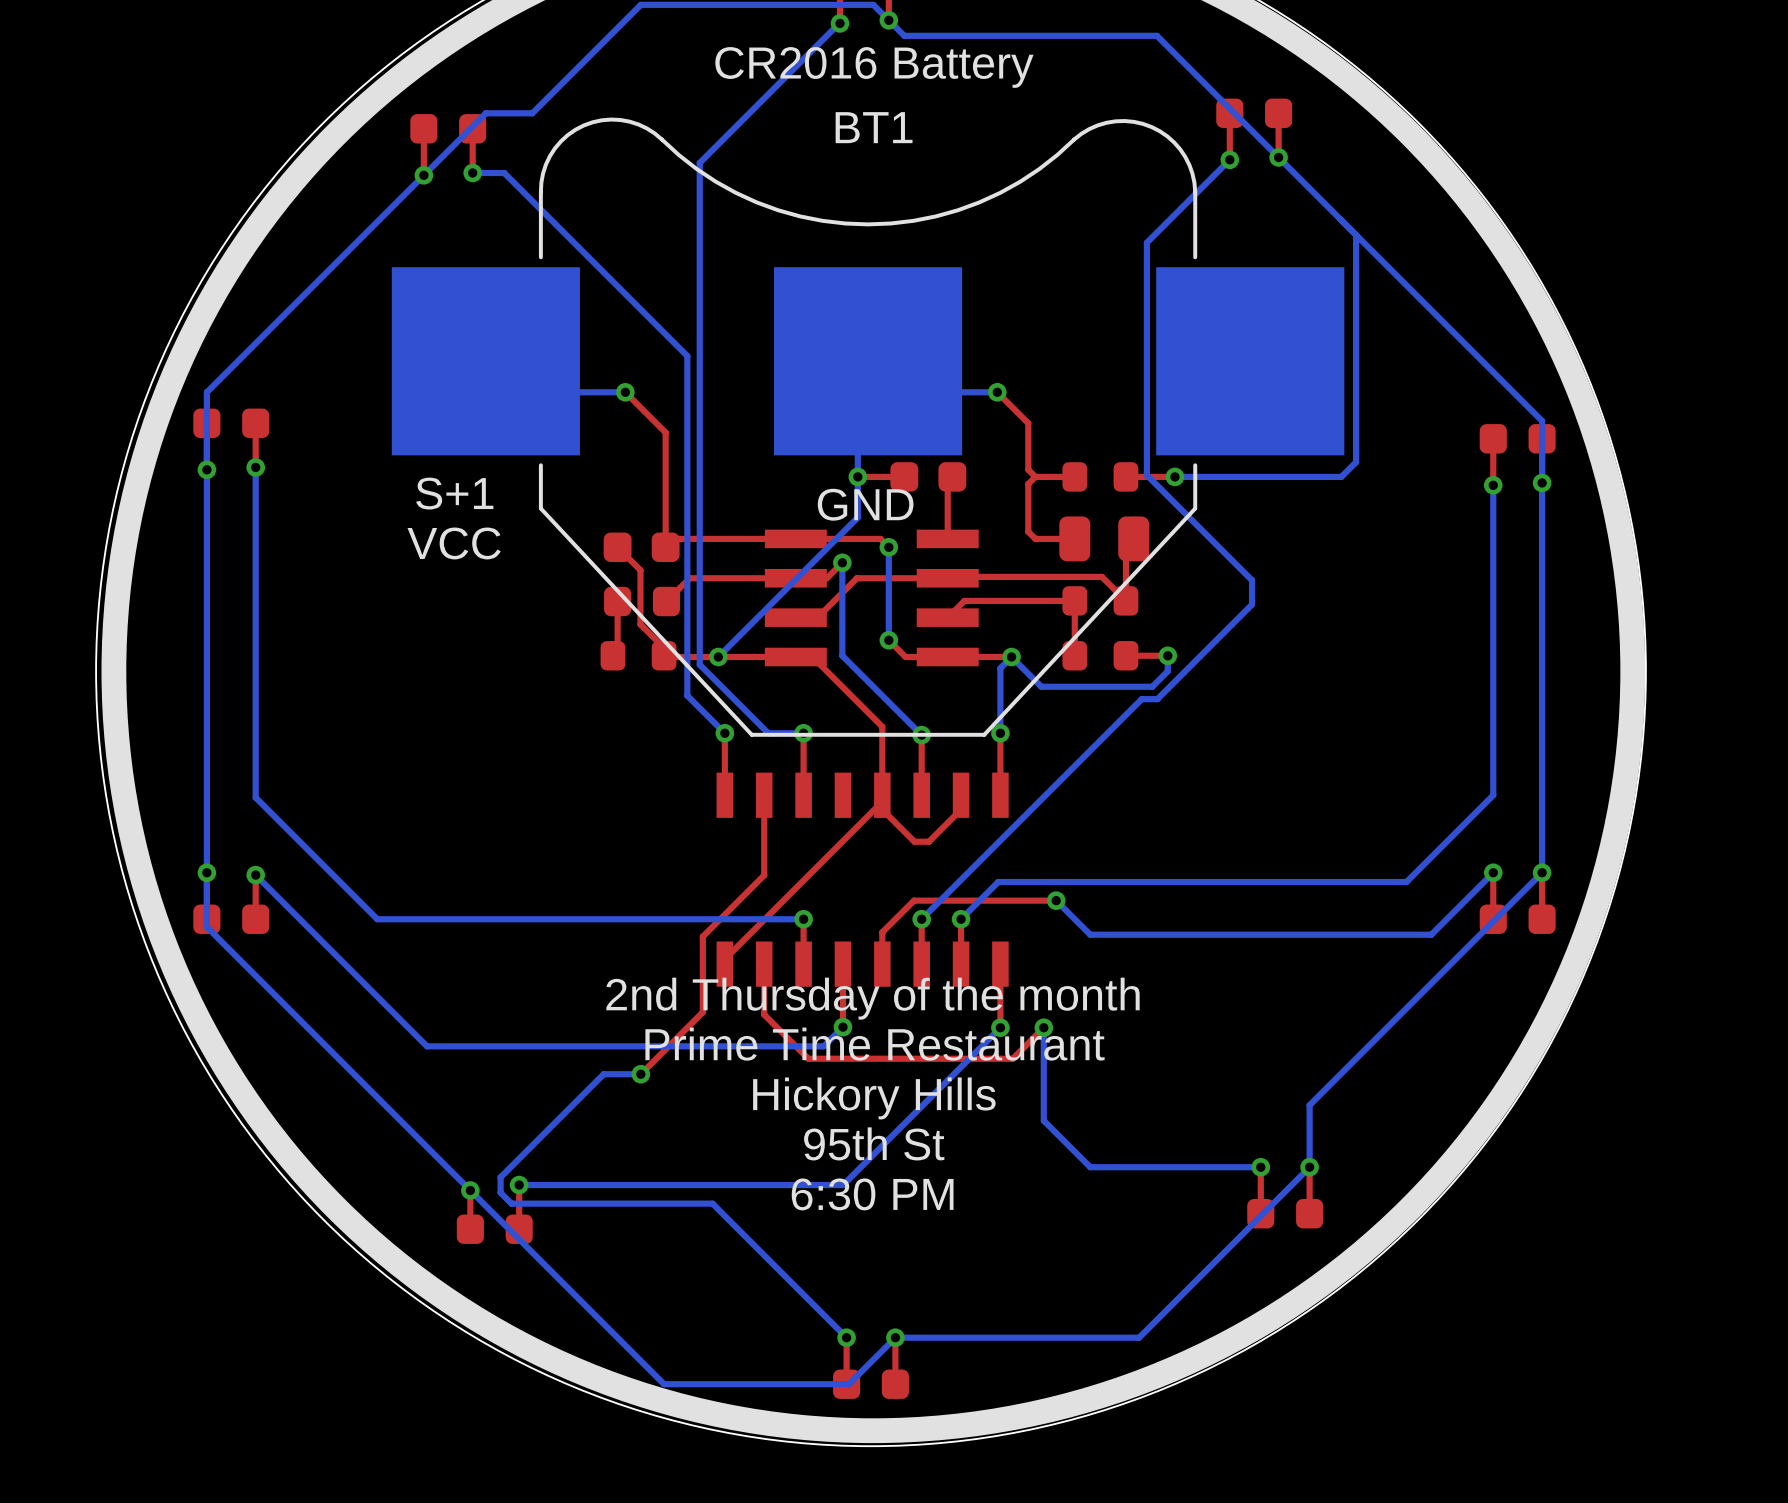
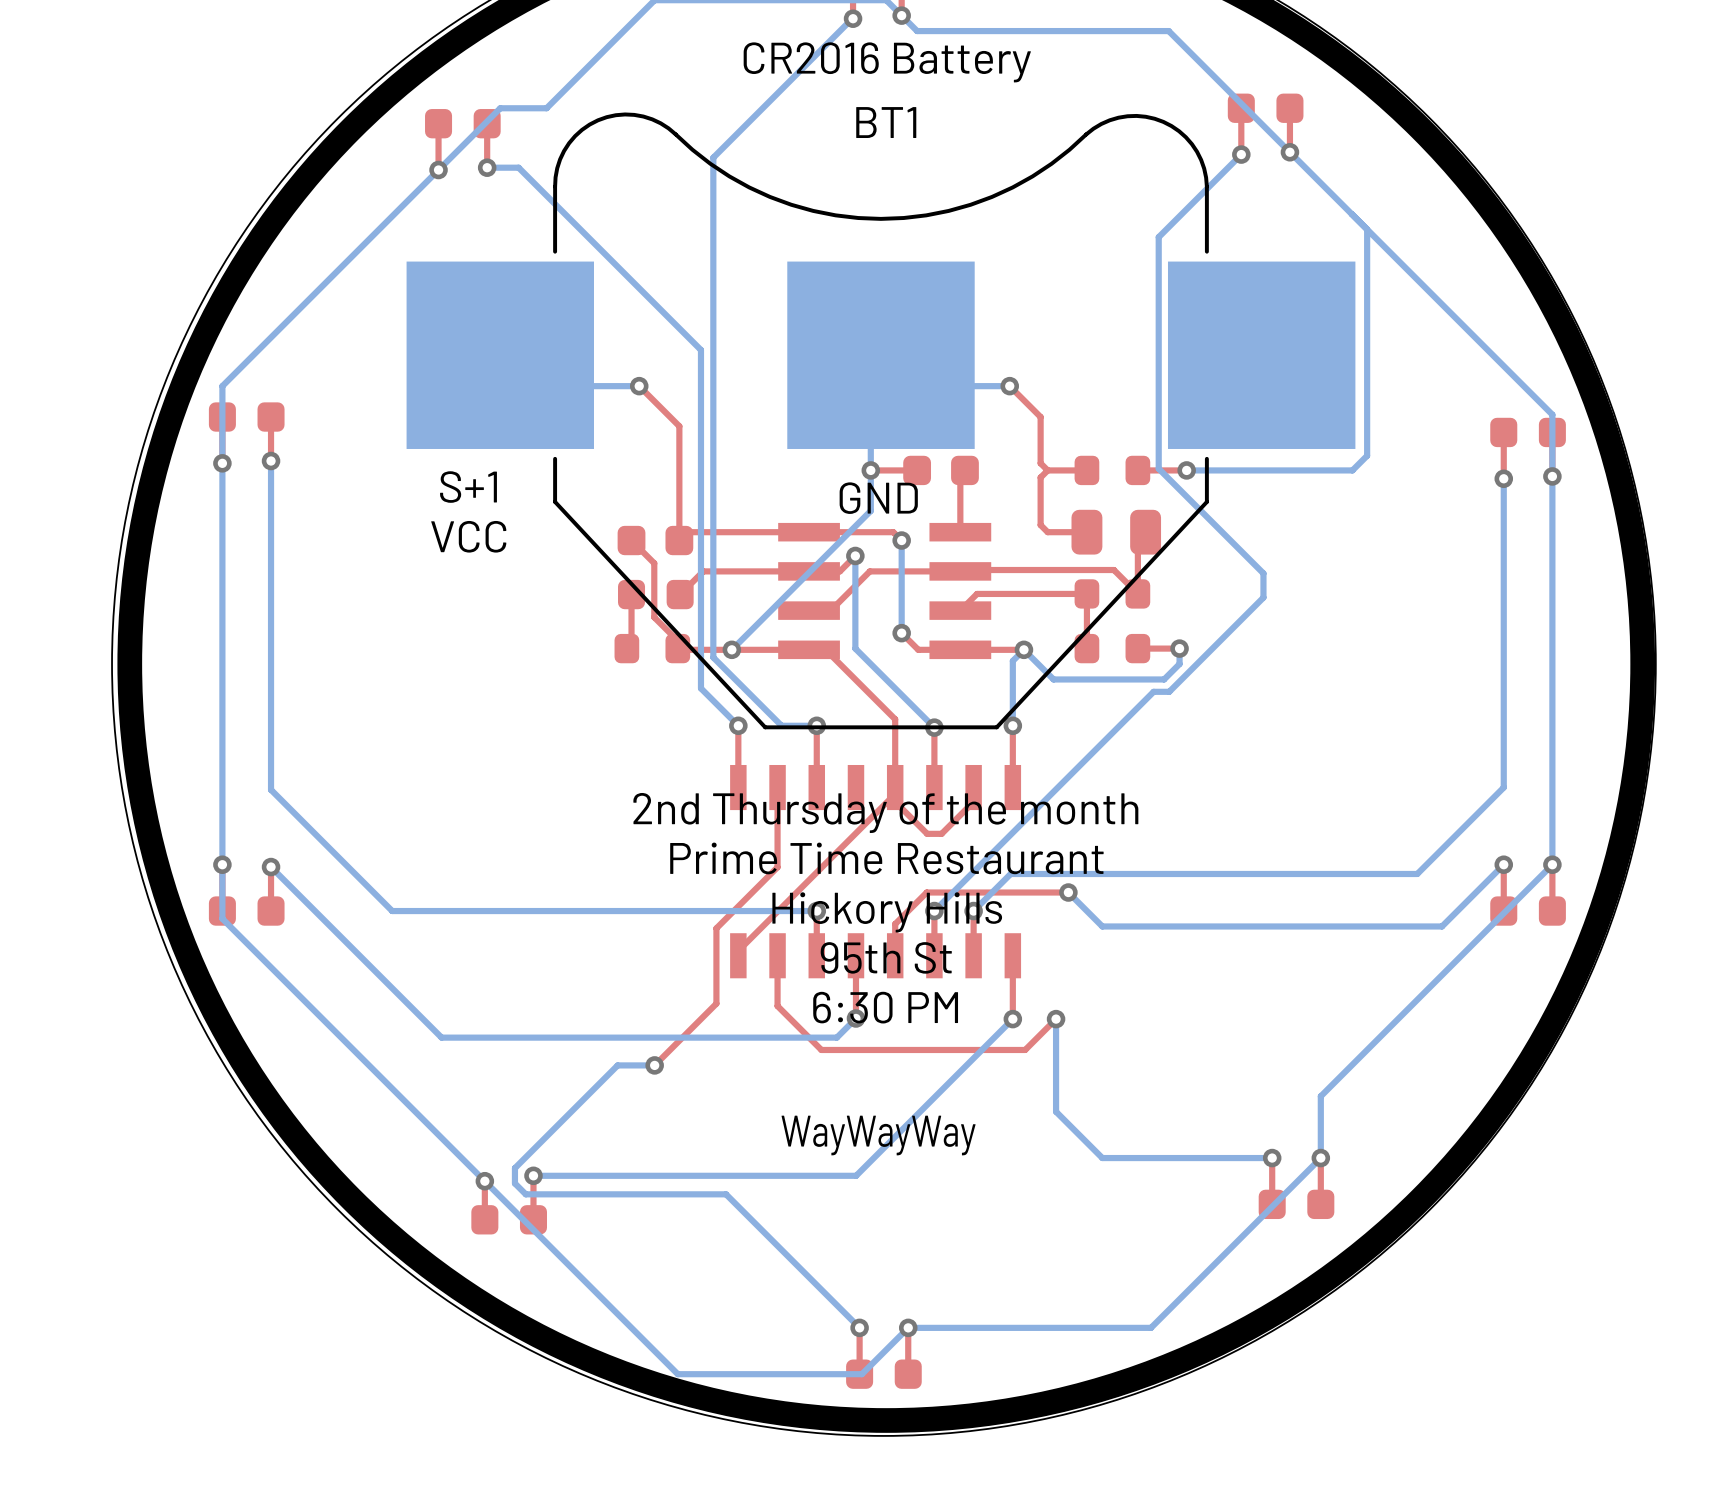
text: none -> 95th St (886, 957)
text position: 2nd Thursday of the month (873, 998) -> 2nd Thursday of the month (885, 813)
text position: Prime Time Restaurant (875, 1044) -> Prime Time Restaurant (886, 858)
text position: Hickory Hills (874, 1098) -> Hickory Hills (887, 912)
text: 95th St (874, 1143) -> WayWayWay (878, 1135)
text position: 6:30 PM (872, 1194) -> 6:30 PM (885, 1007)

